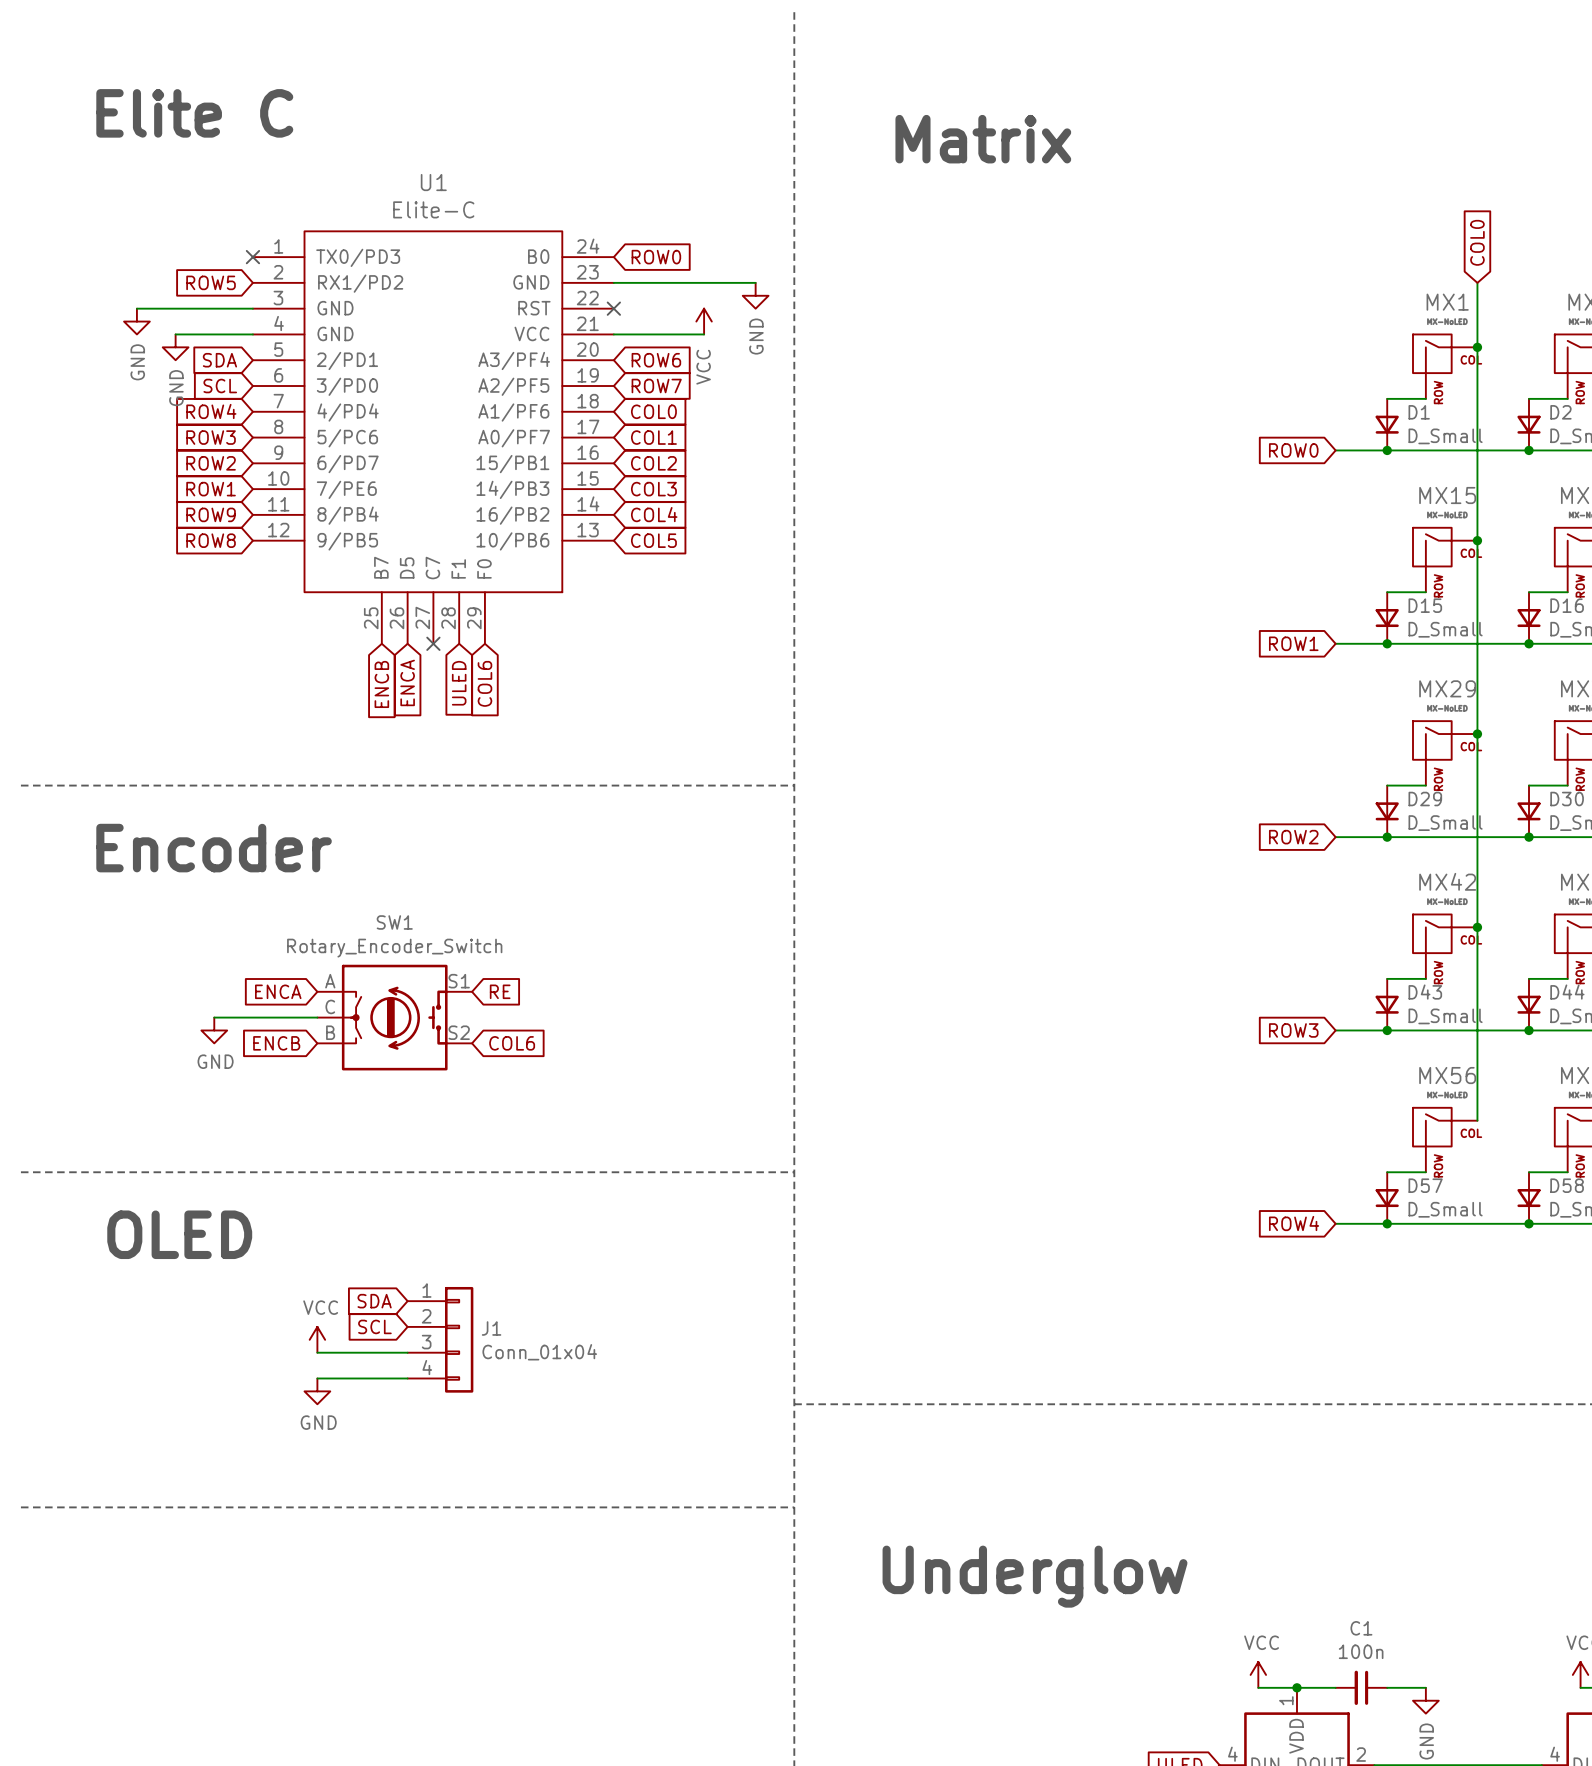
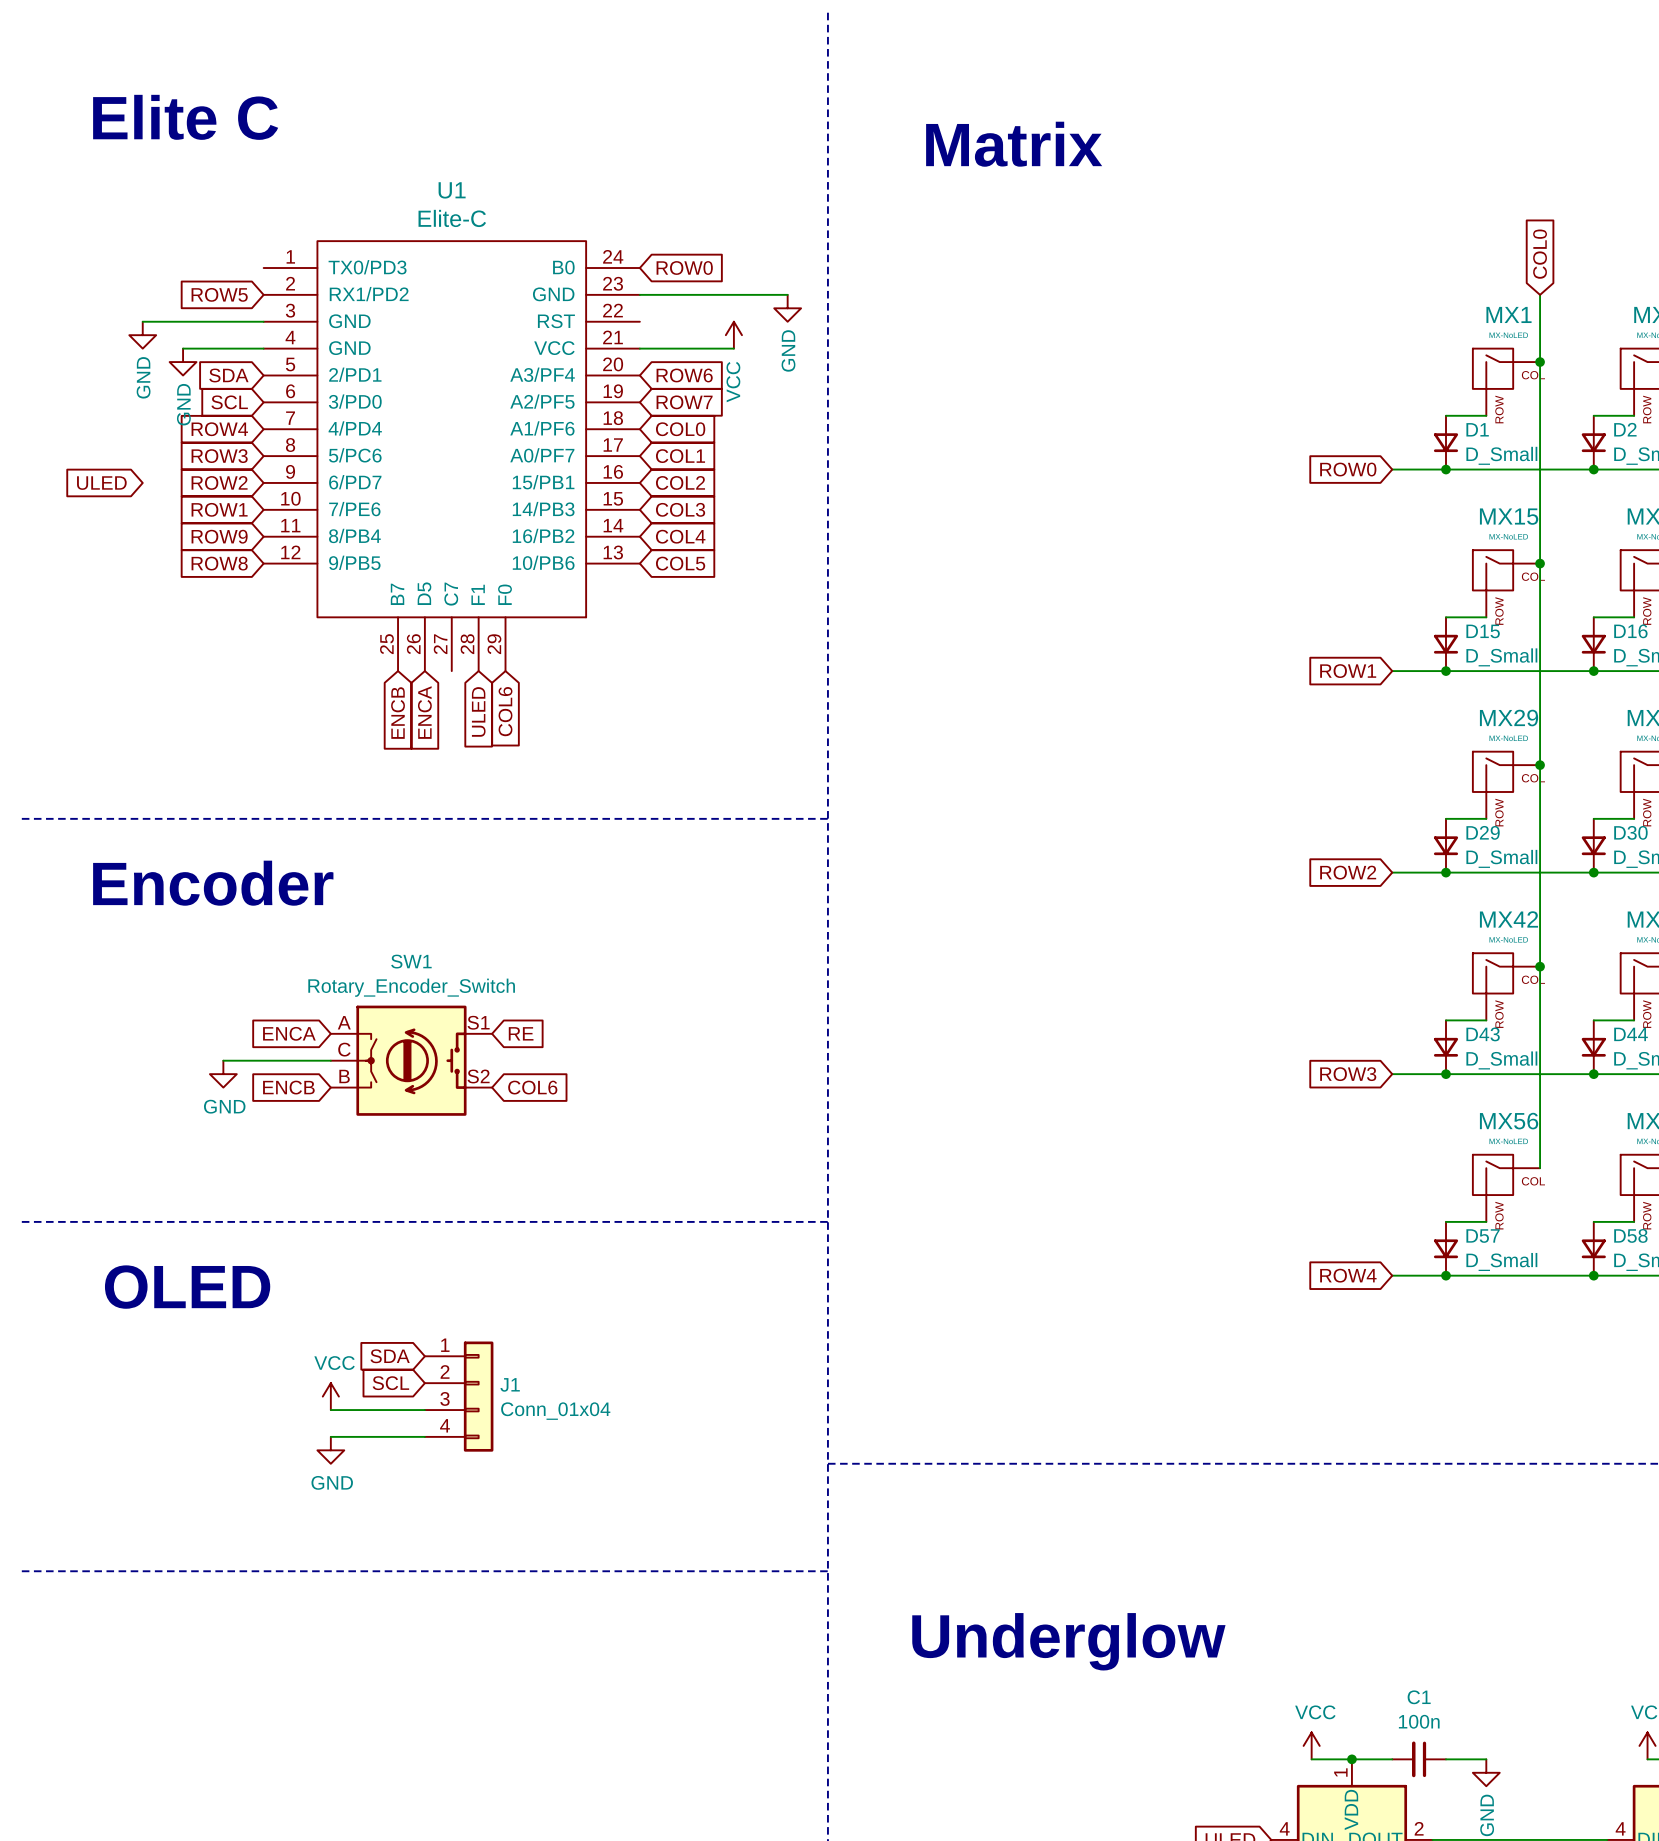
no-connect mark: (252, 257) -> none
no-connect mark: (613, 308) -> none
global label: none -> ULED (101, 483)
no-connect mark: (433, 643) -> none

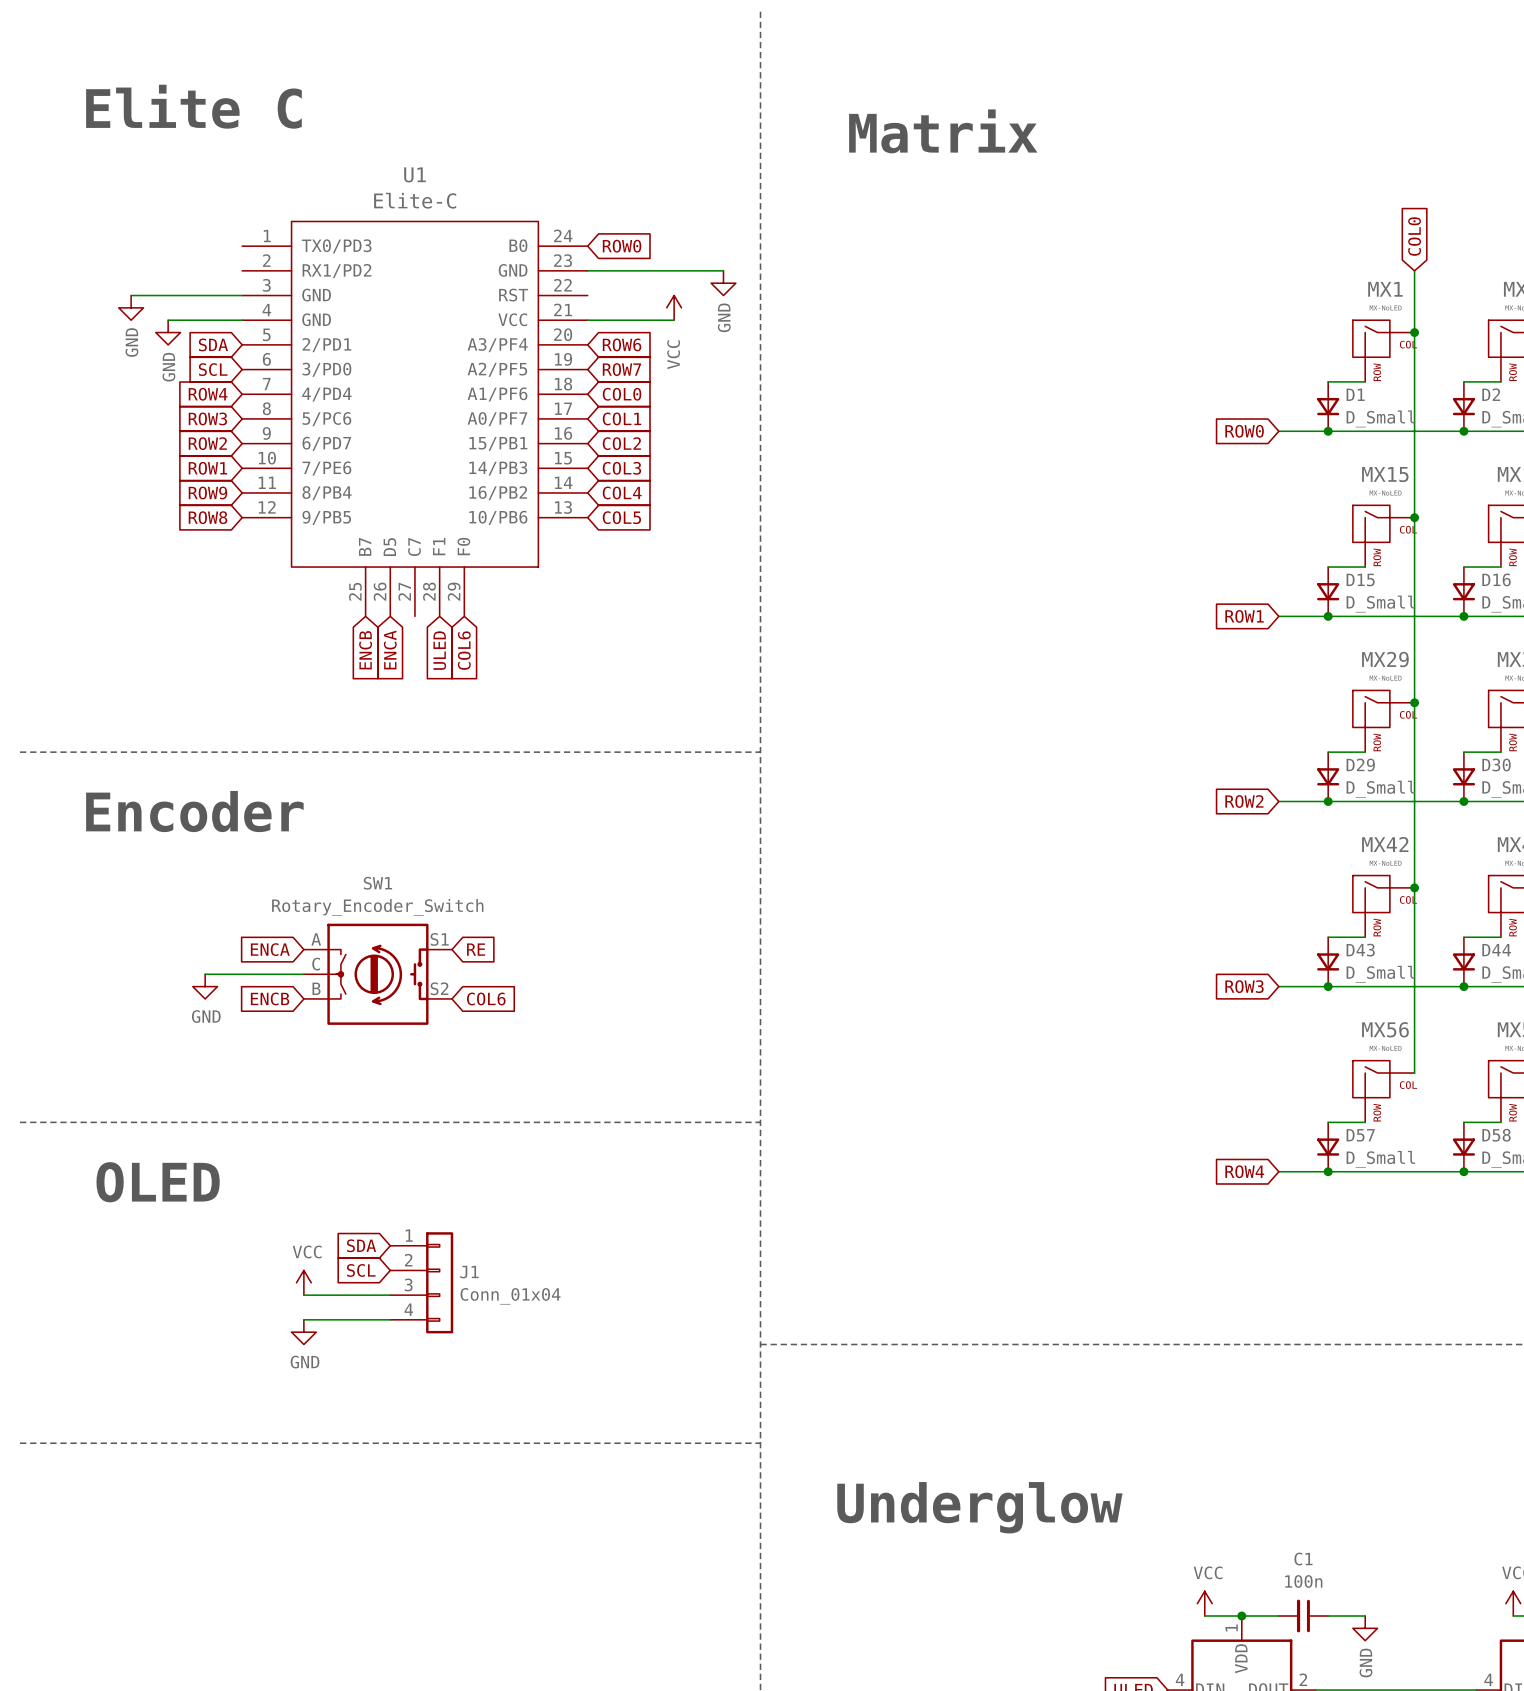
global label: ROW5 (219, 294) -> none
global label: ULED (101, 483) -> none

